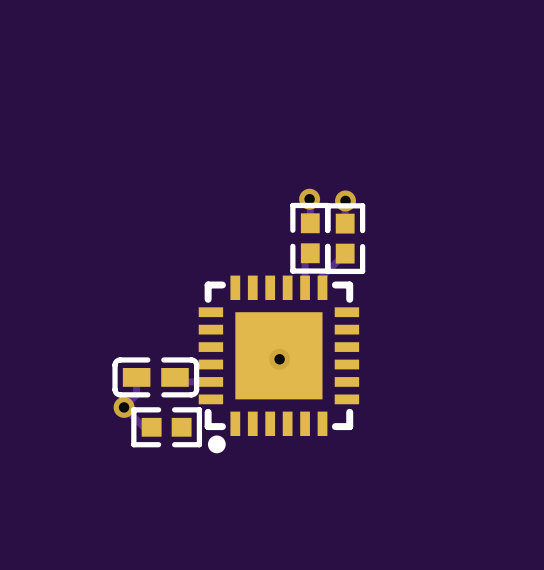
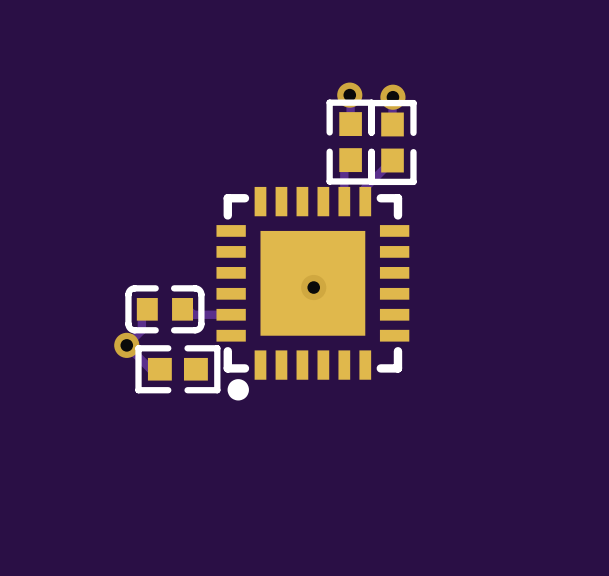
part footprint: [112, 357, 200, 398] -> [125, 285, 205, 334]

